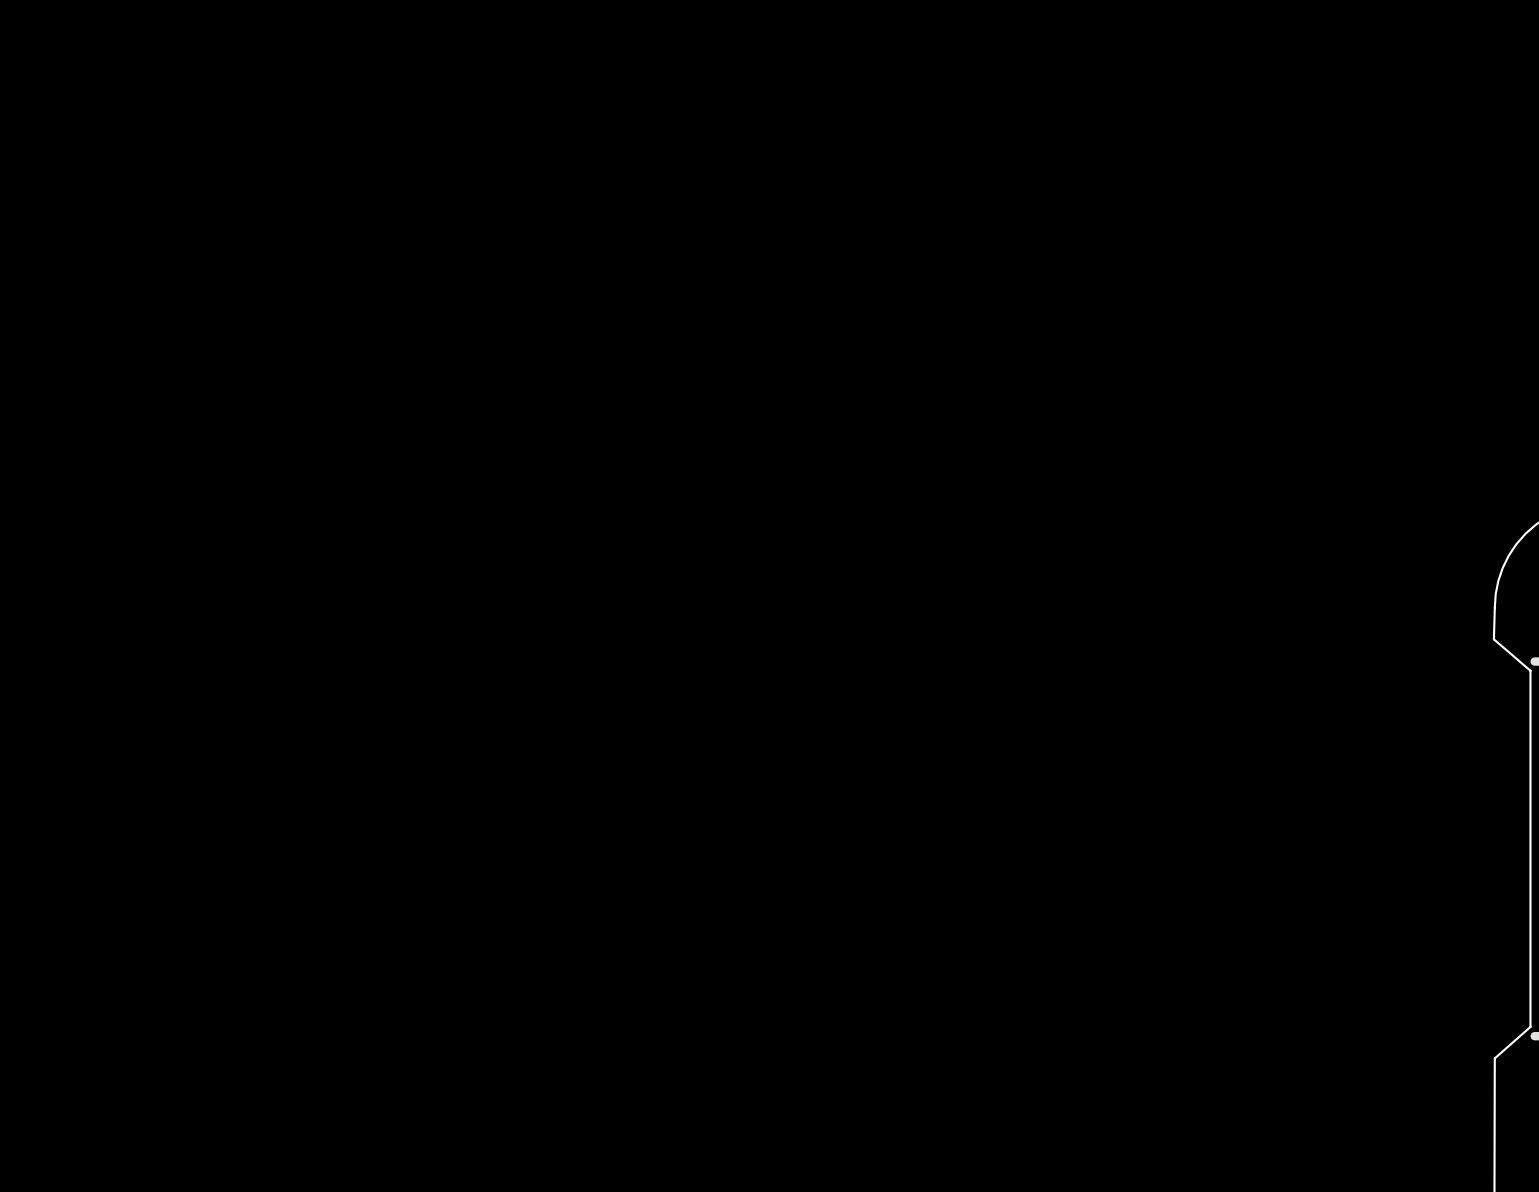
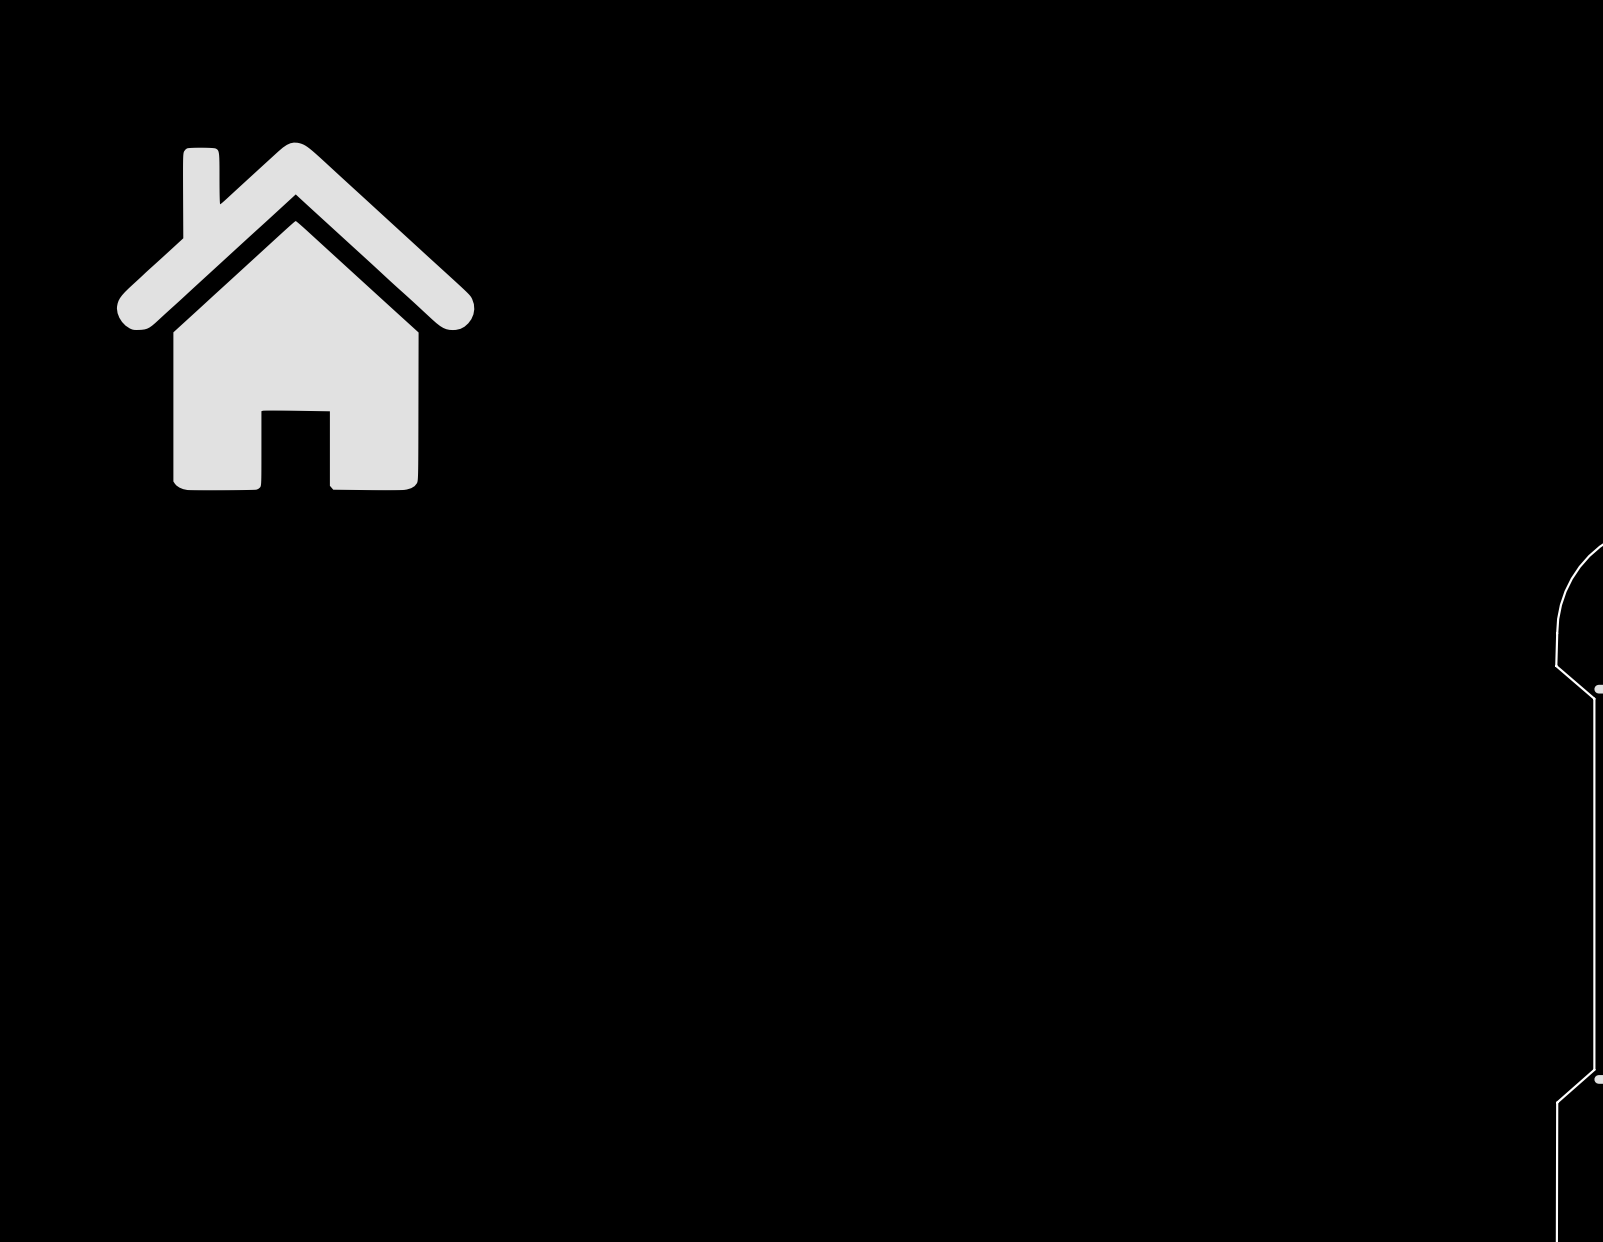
drawing: none -> [116, 142, 475, 491]

